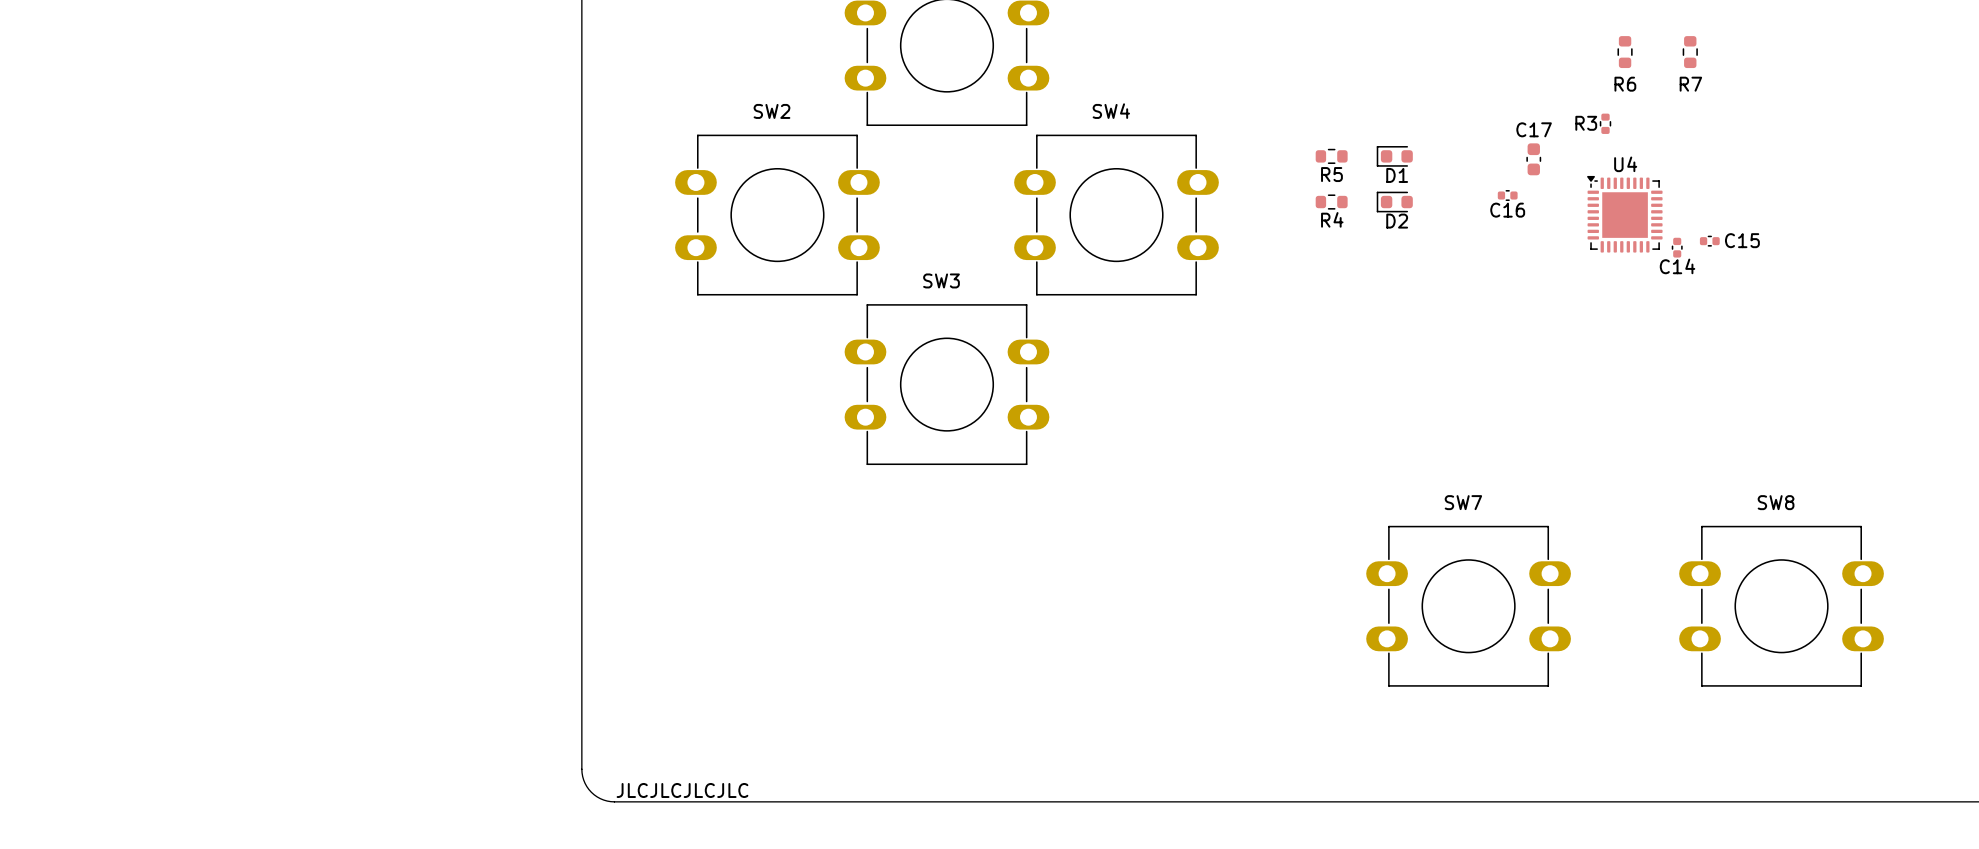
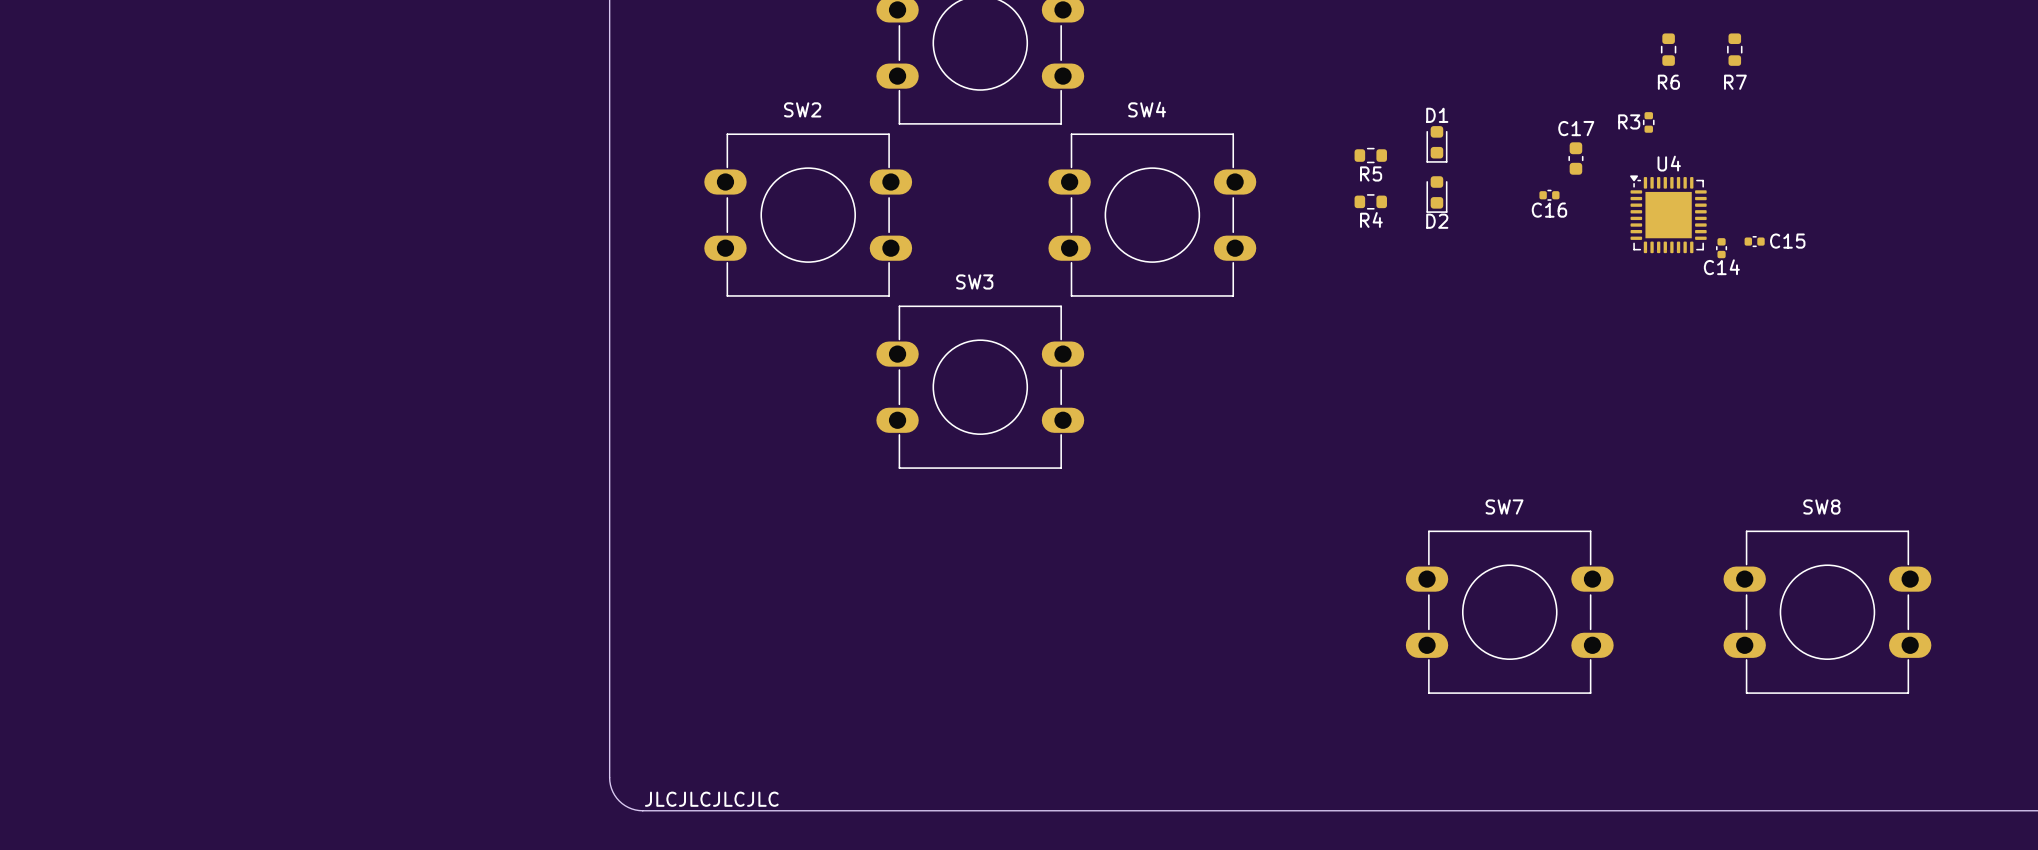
D1 rotation: 0° (1394, 156) -> 90° counterclockwise (1436, 144)
D1 name position: D1 (1397, 175) -> D1 (1437, 115)
D2 rotation: 0° (1394, 202) -> 90° counterclockwise (1436, 194)

